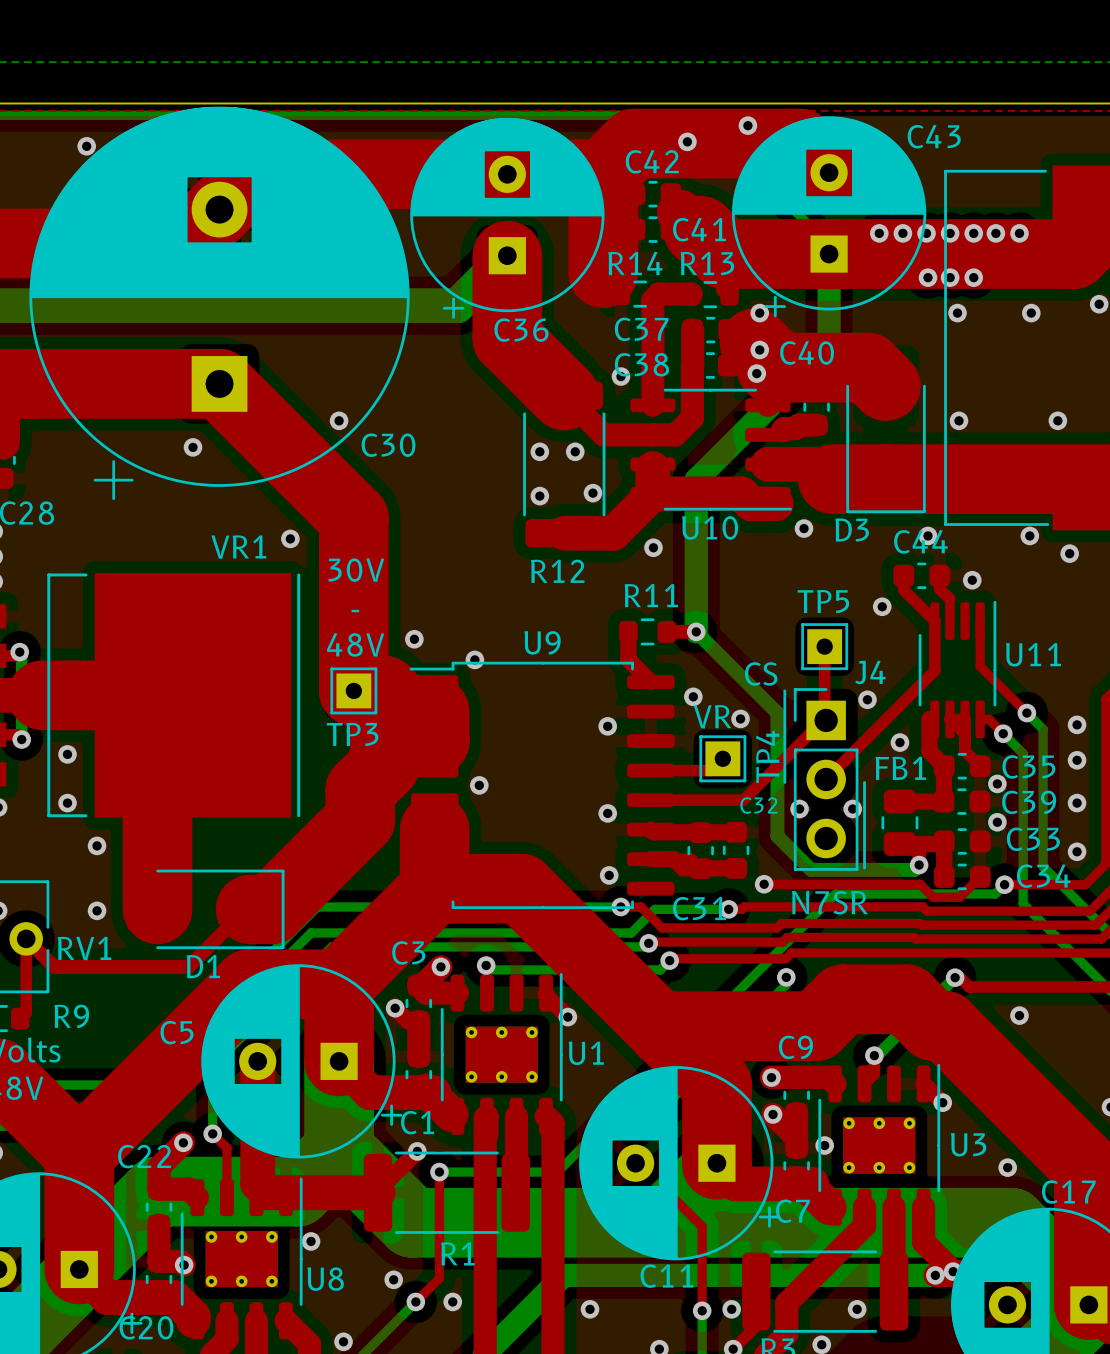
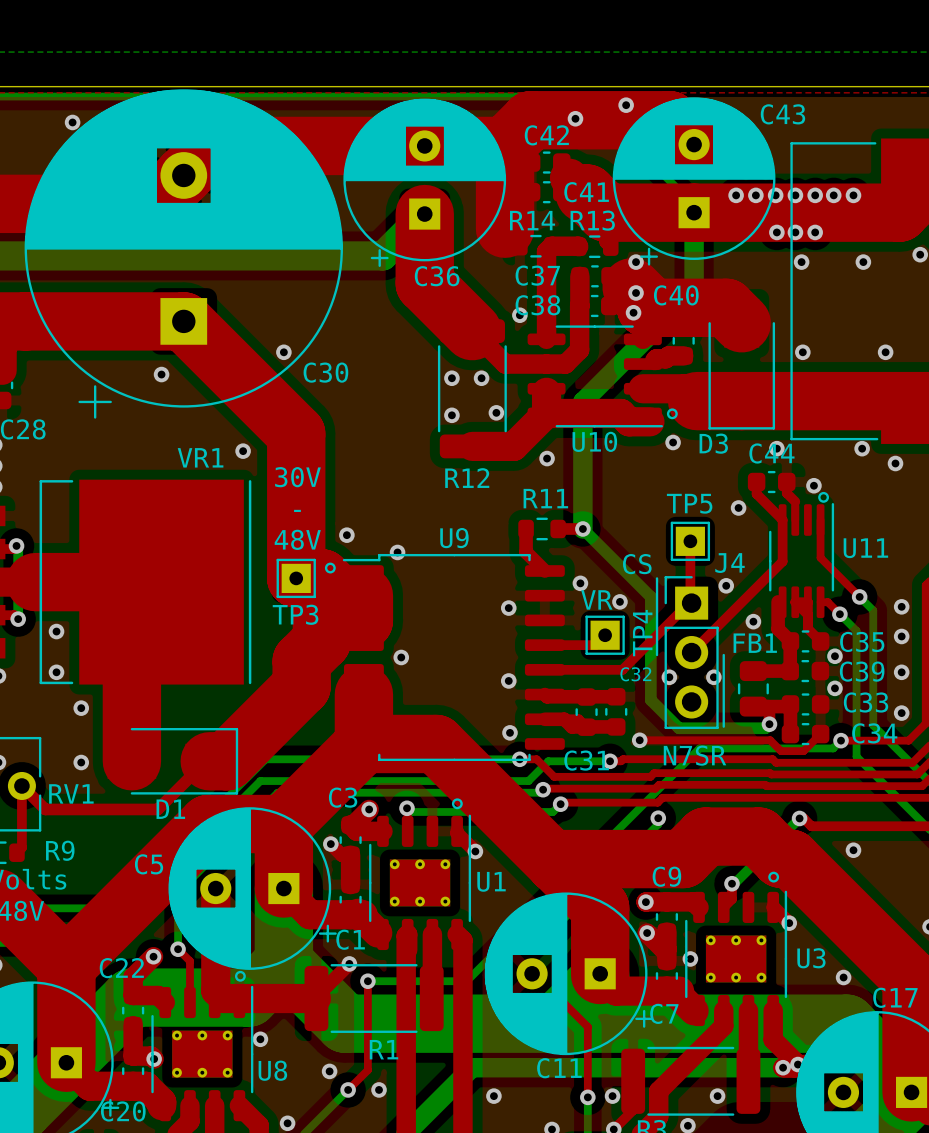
drawing: none -> [666, 408, 678, 420]
drawing: none -> [818, 491, 830, 503]
drawing: none -> [324, 562, 336, 574]
drawing: none -> [451, 798, 463, 810]
drawing: none -> [768, 871, 780, 883]
drawing: none -> [234, 970, 246, 982]

